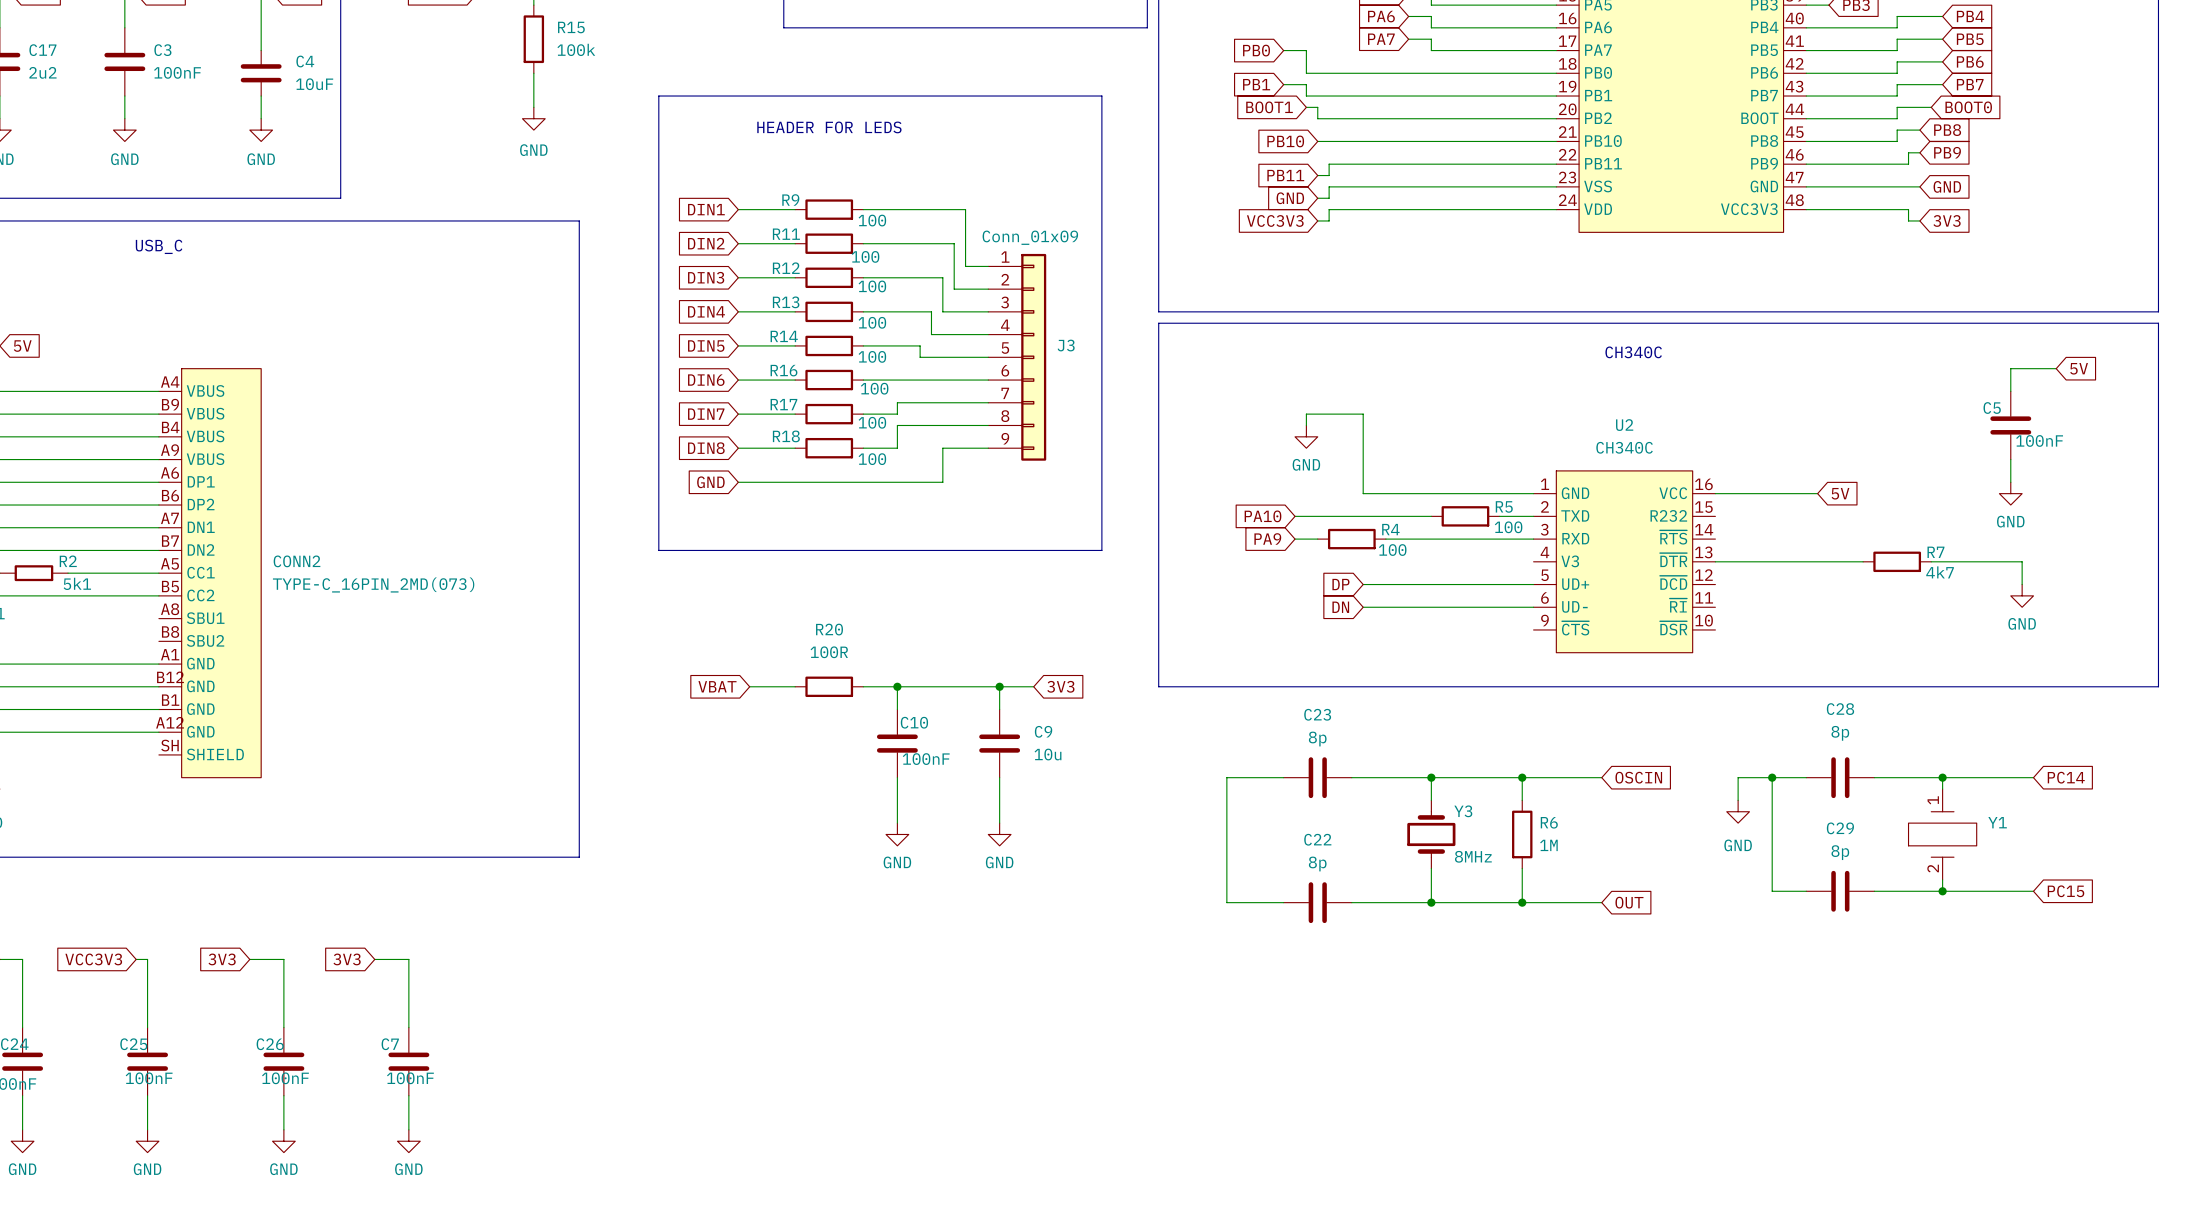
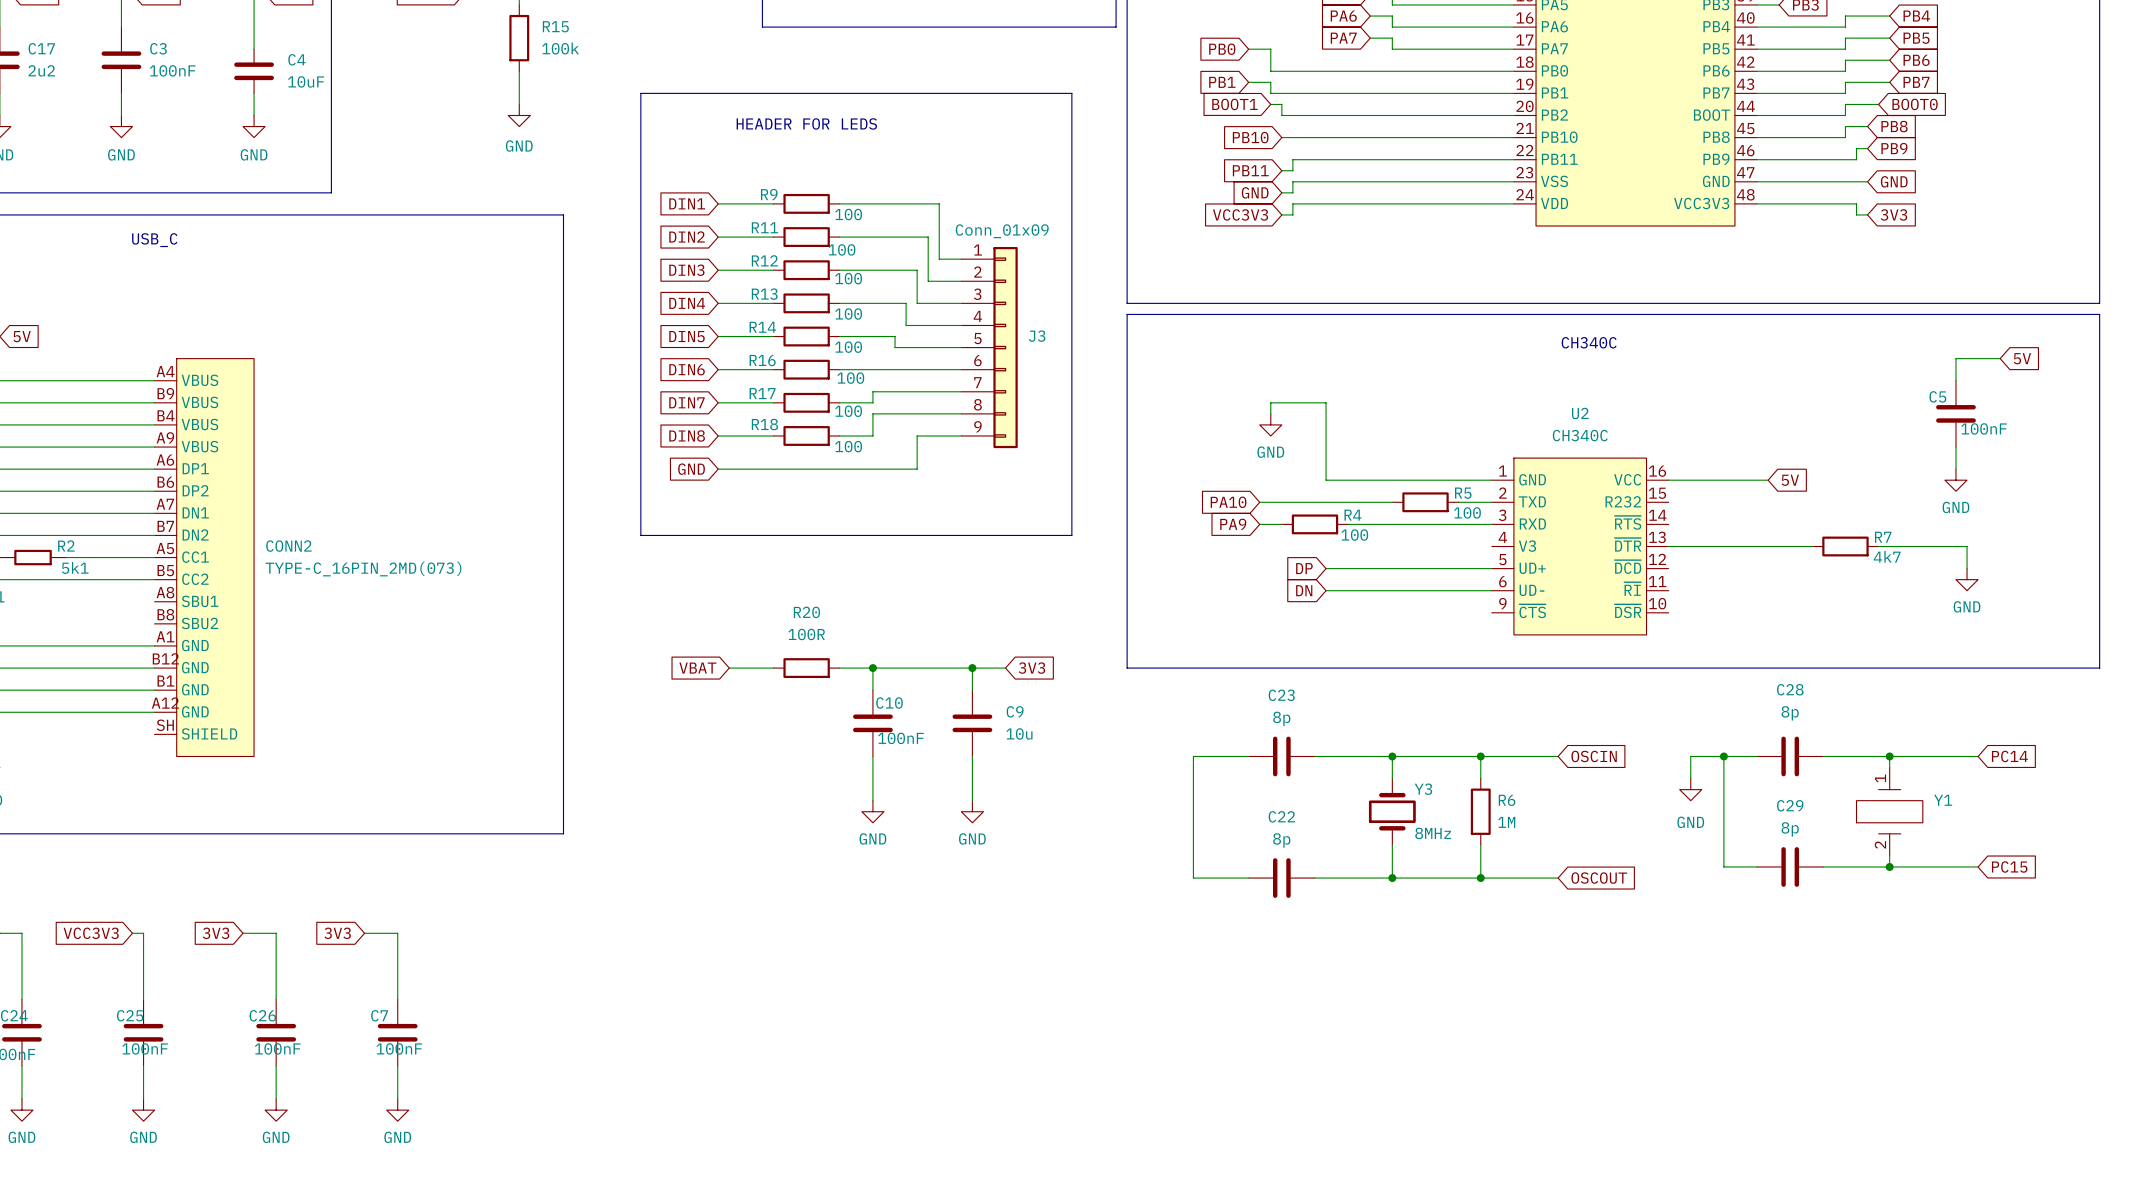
global label: OUT (1629, 902) -> OSCOUT (1599, 878)

